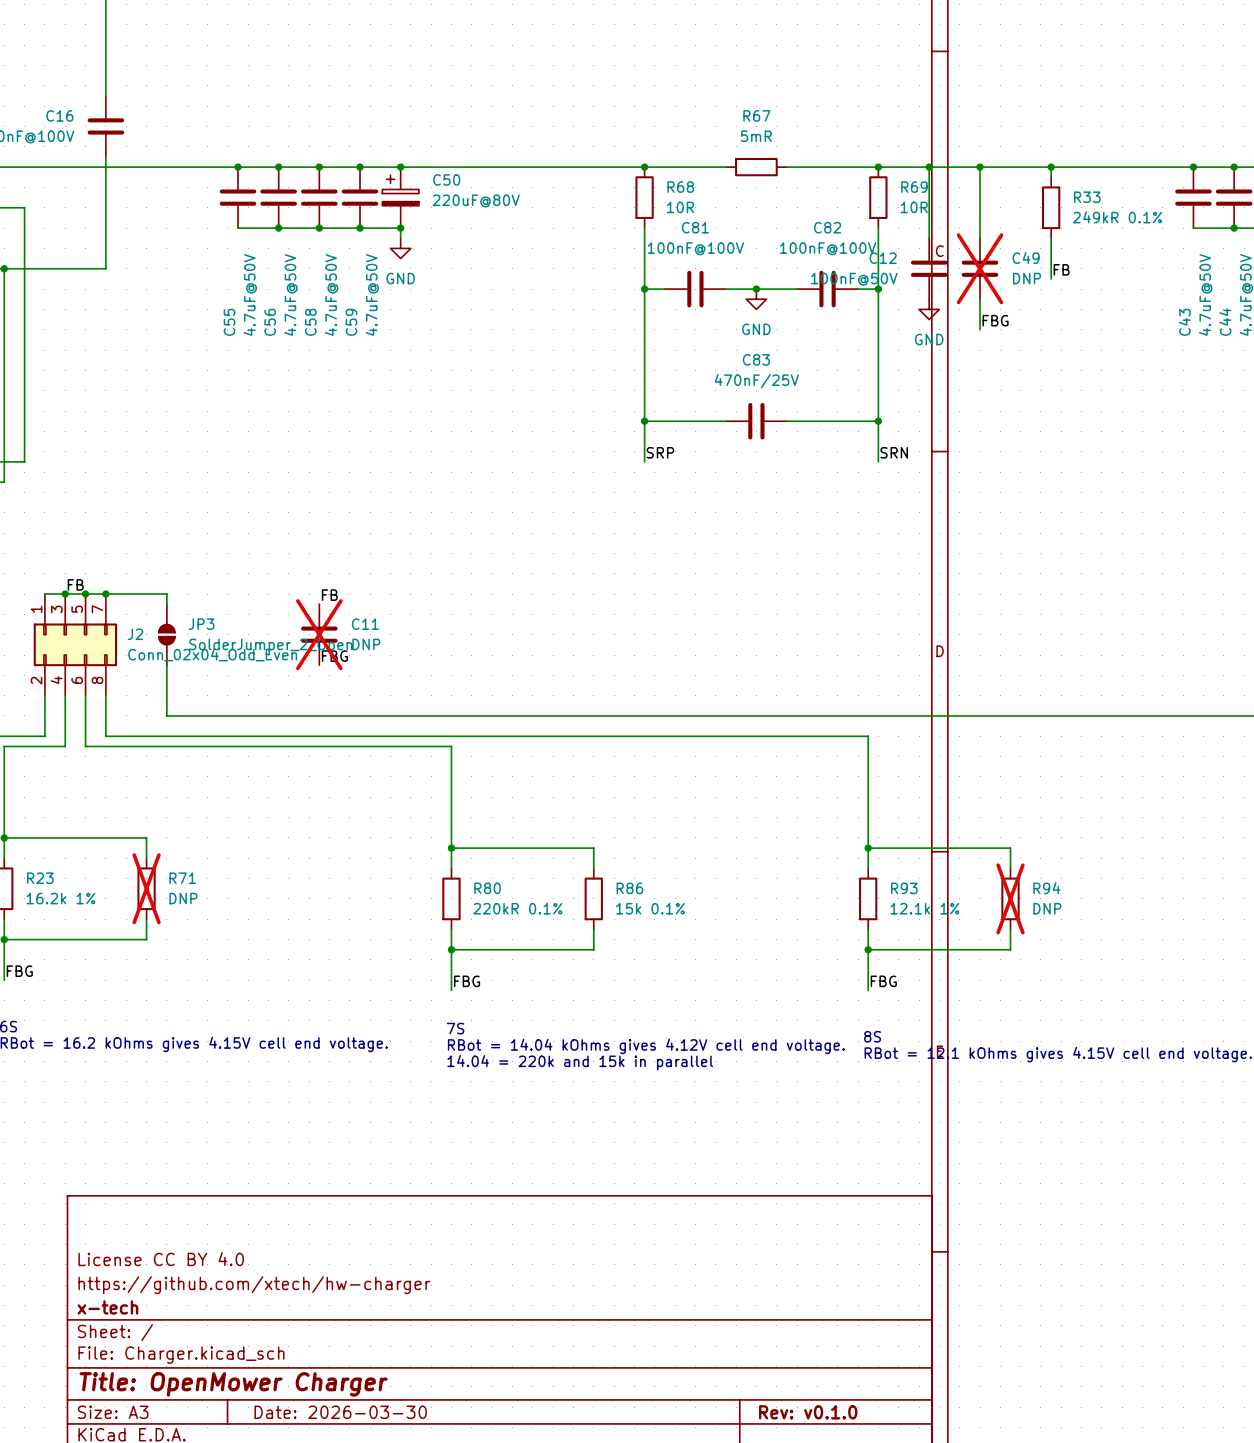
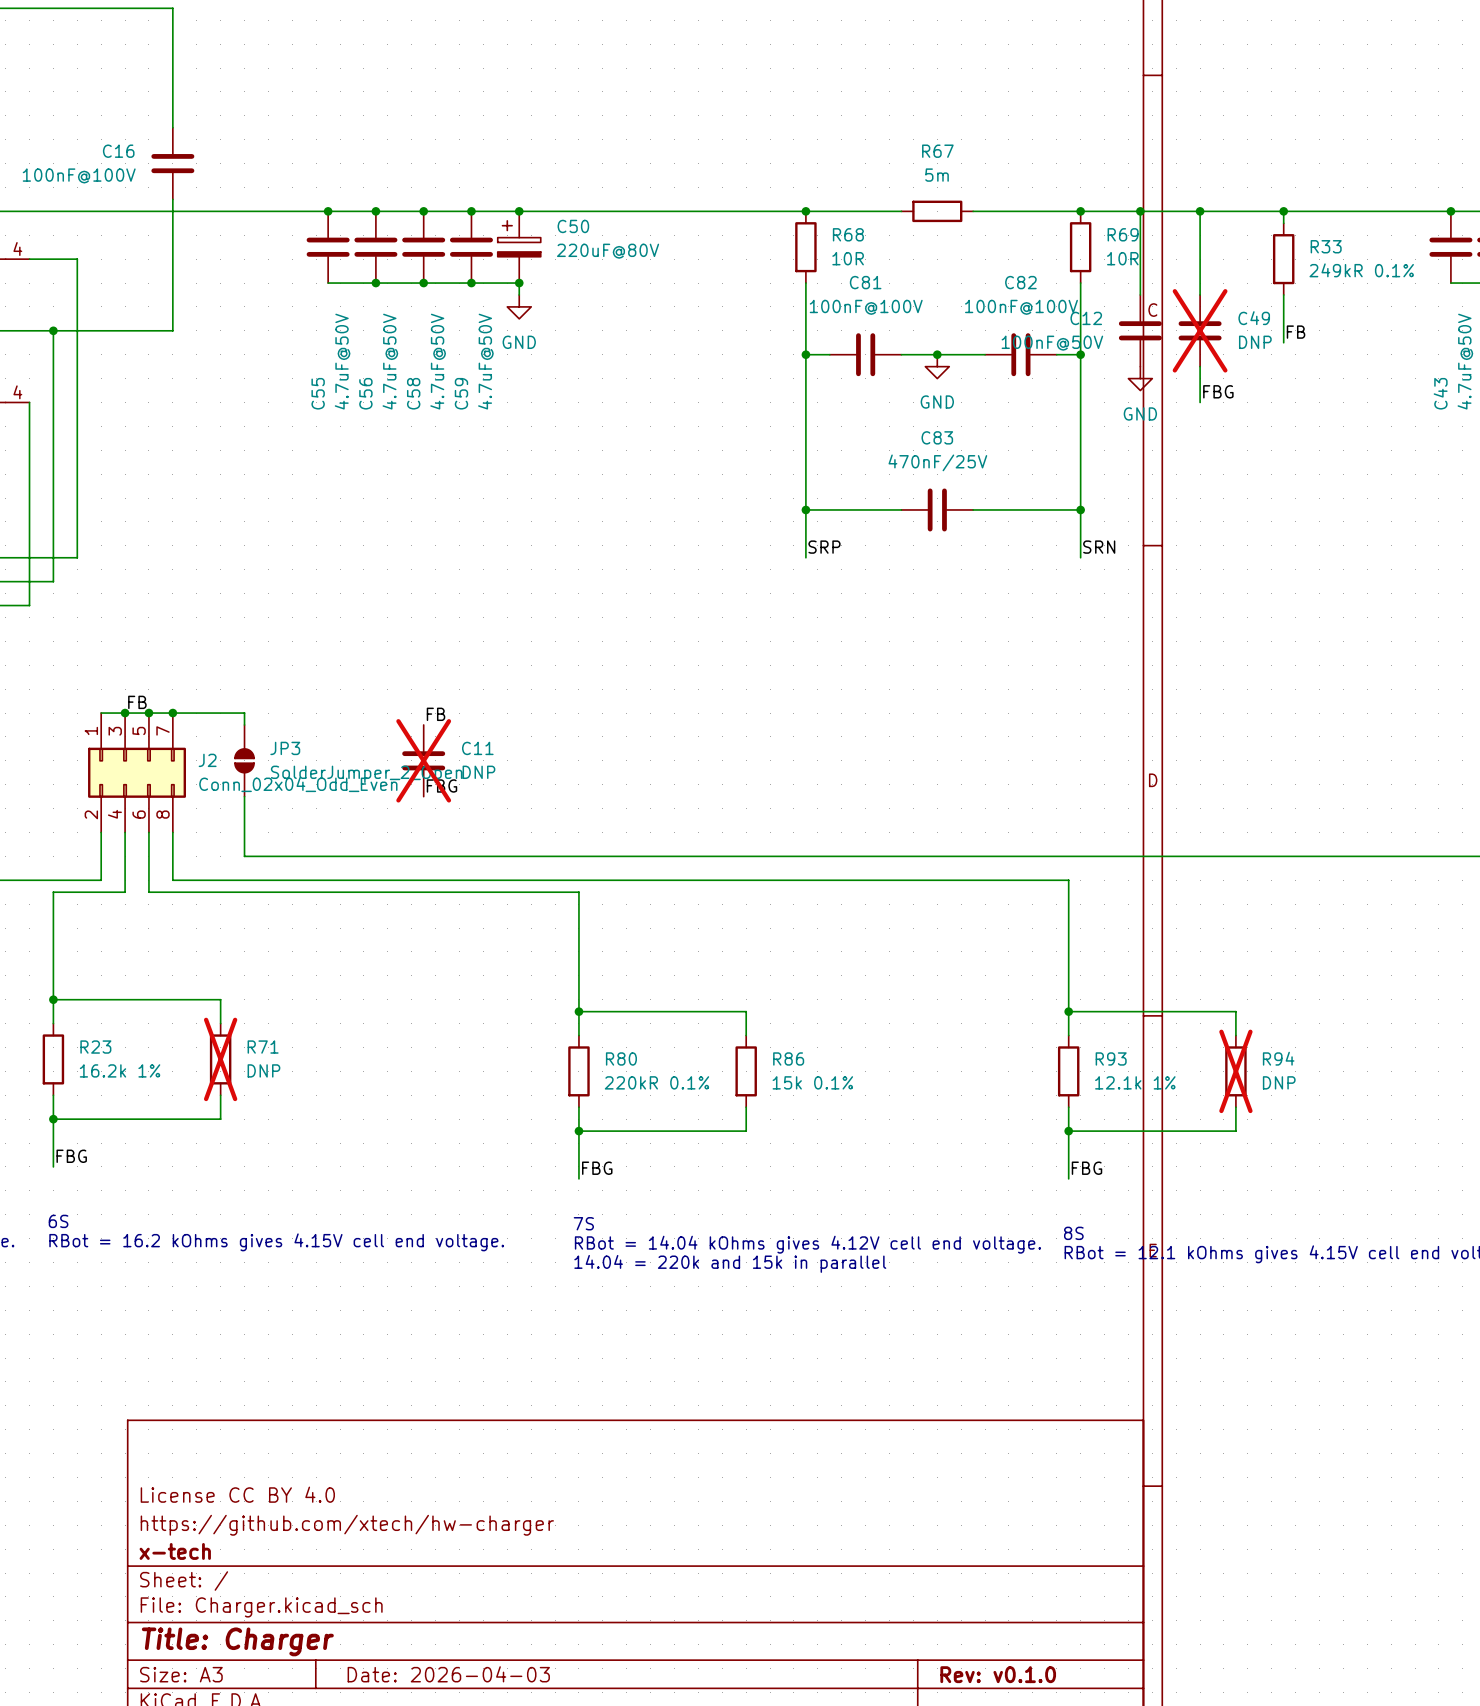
R67 value: 5mR (756, 136) -> 5m (937, 175)
title block: Title: OpenMower Charger (233, 1384) -> Title: Charger (237, 1641)
title block: Date: 2026-03-30 (340, 1412) -> Date: 2026-04-03 (448, 1674)

